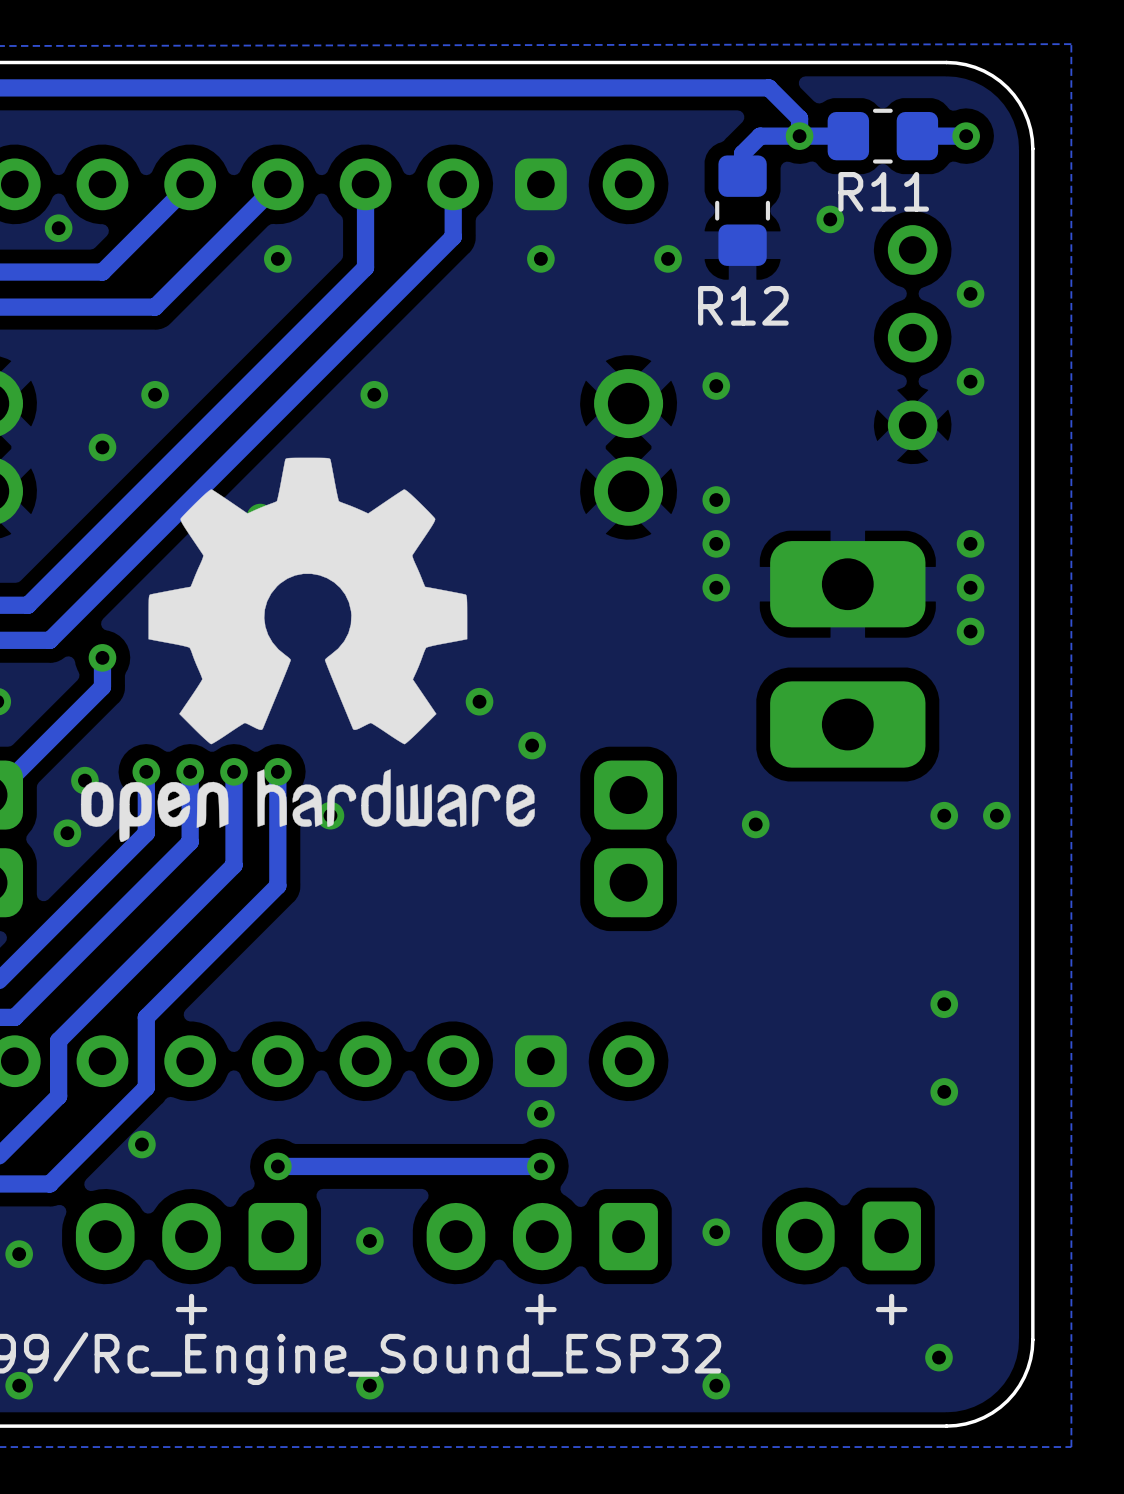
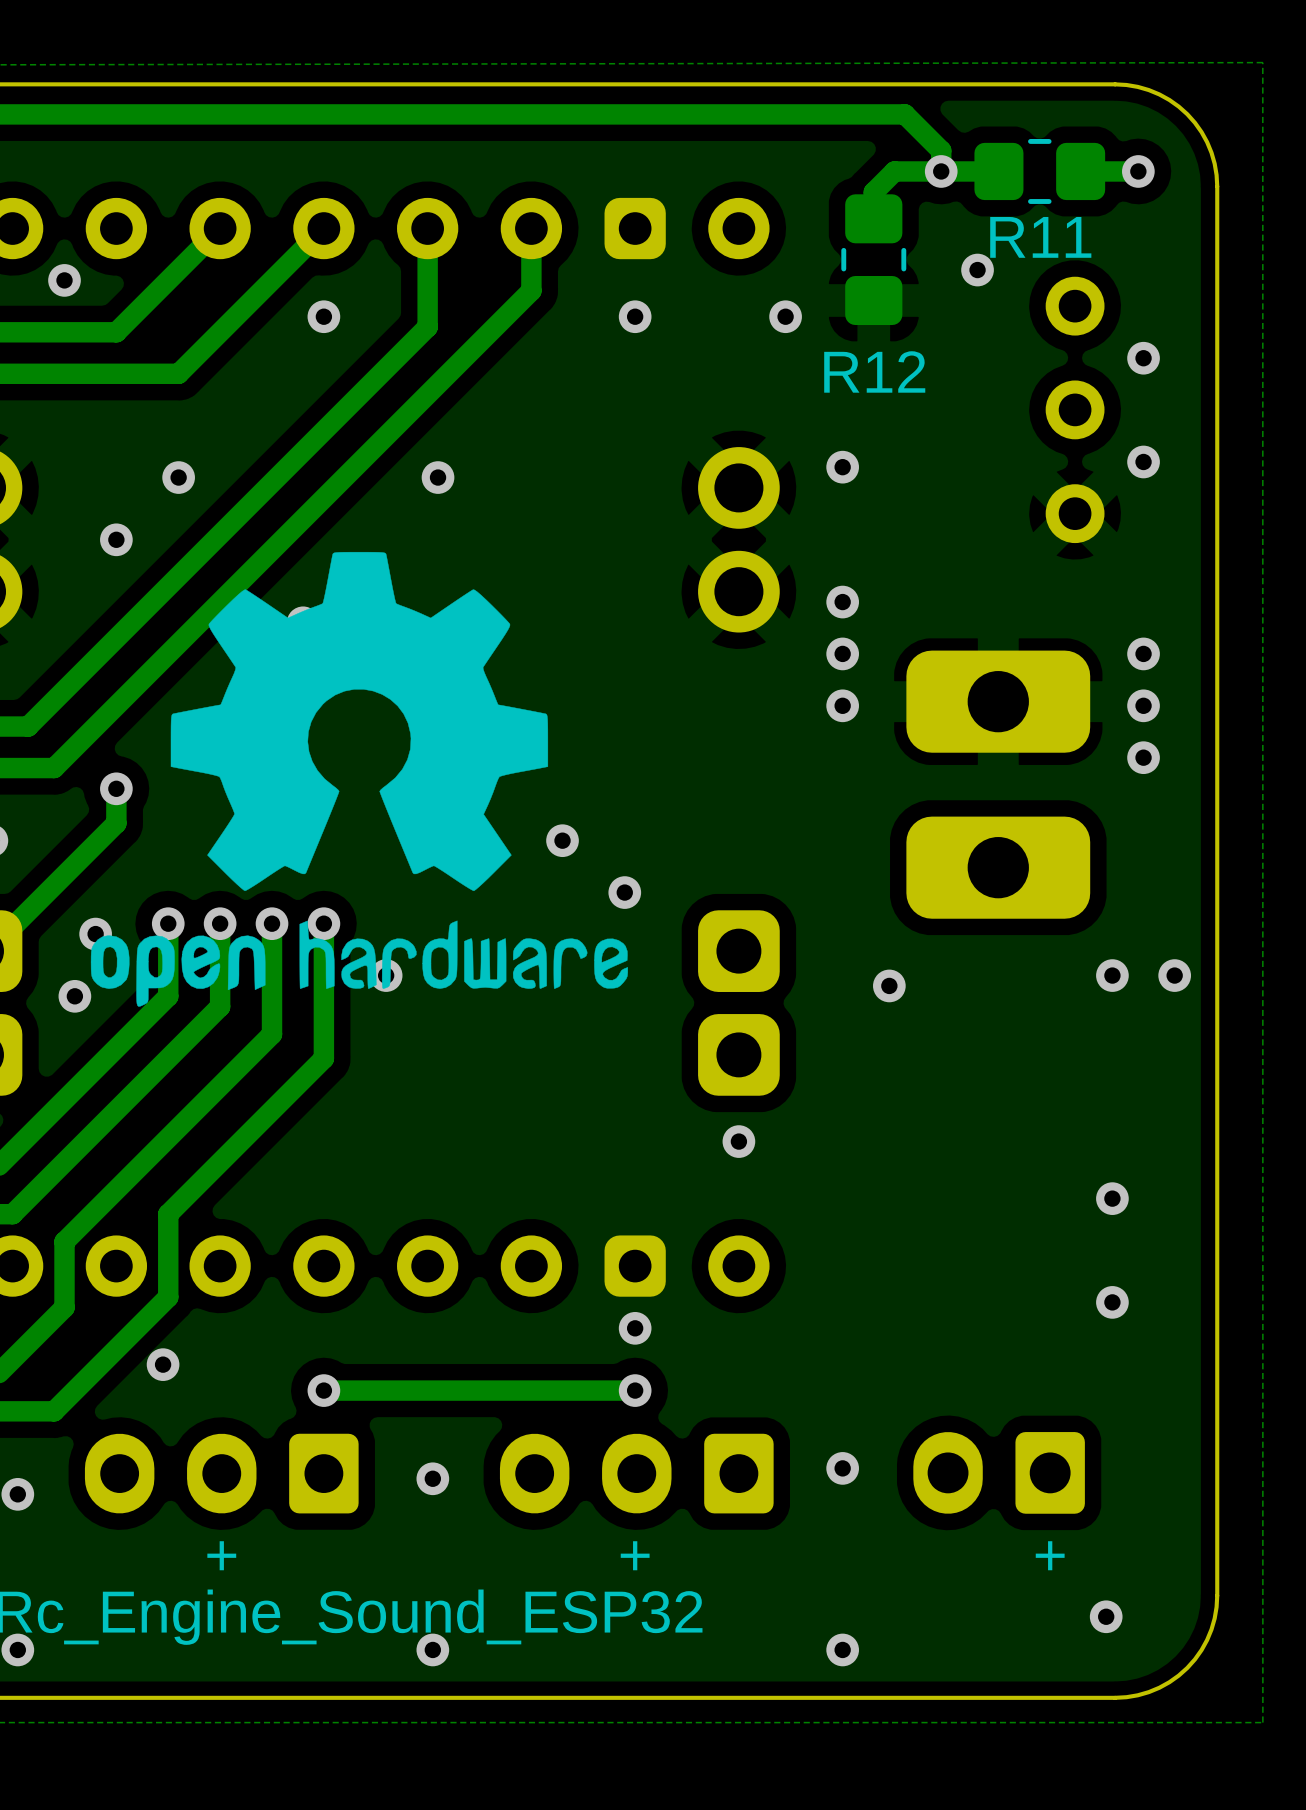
via: none -> (738, 1141)

